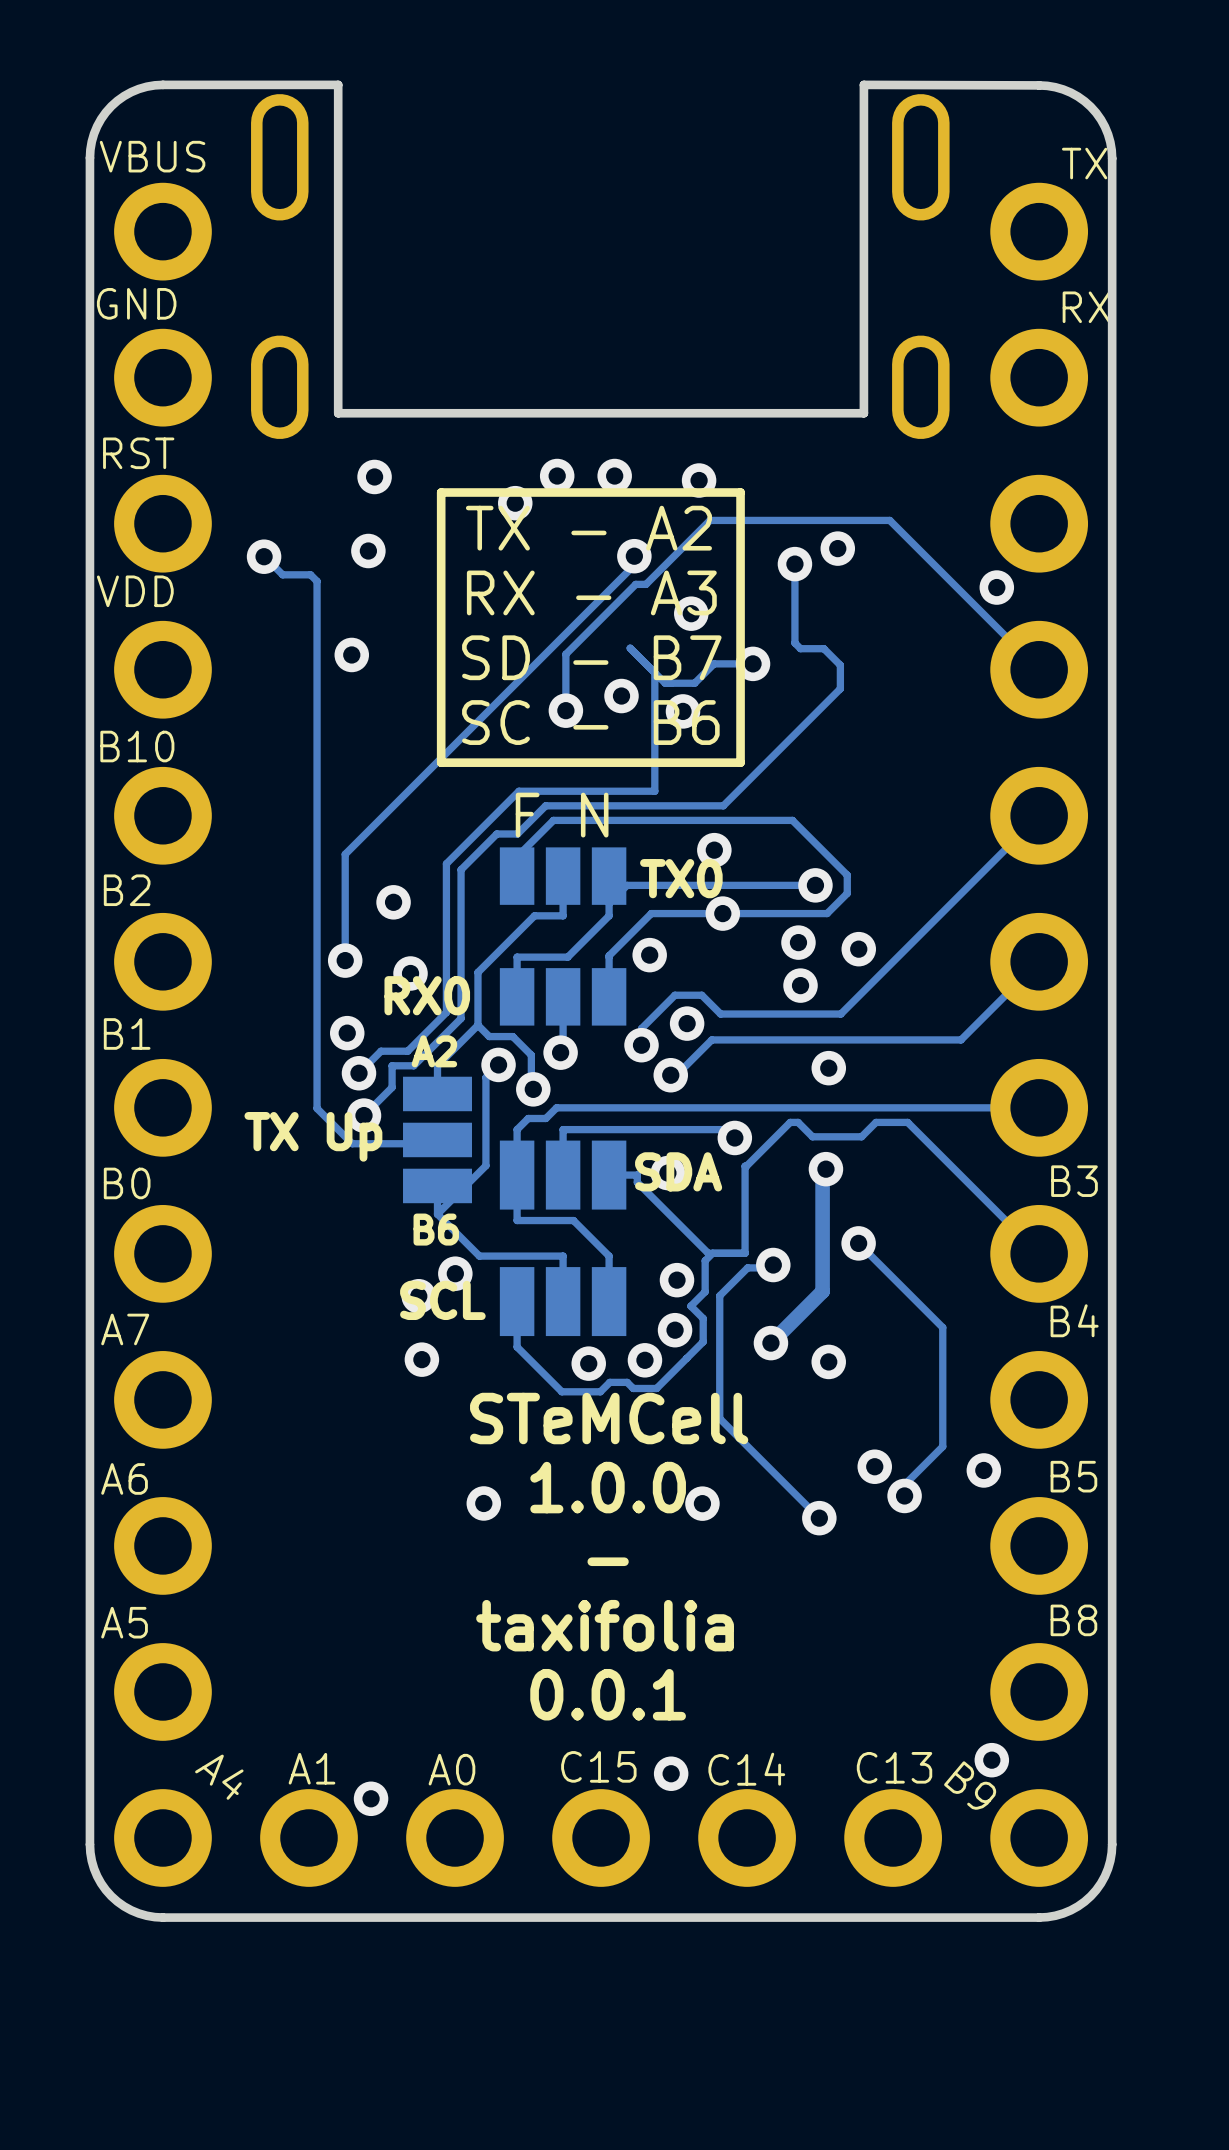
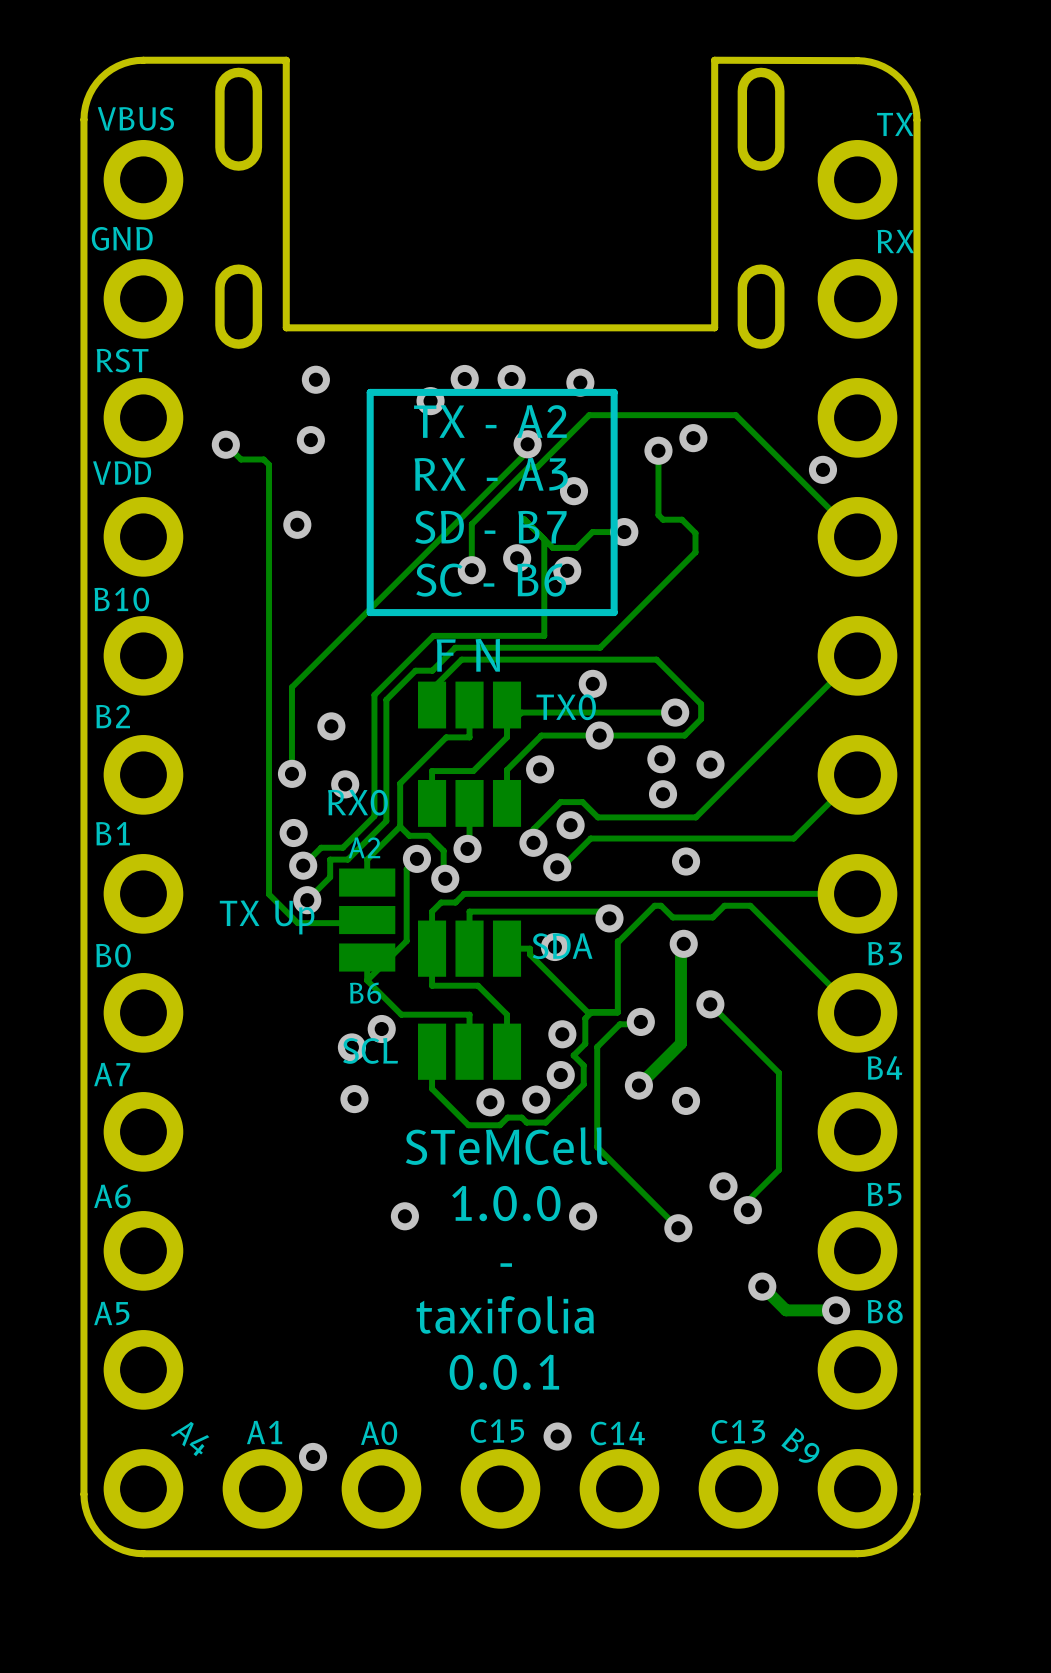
via: (983, 1470) -> none
track: none -> (762, 1286) (786, 1310) (836, 1310)
via: none -> (762, 1286)
via: none -> (836, 1310)
via: (991, 1760) -> none

